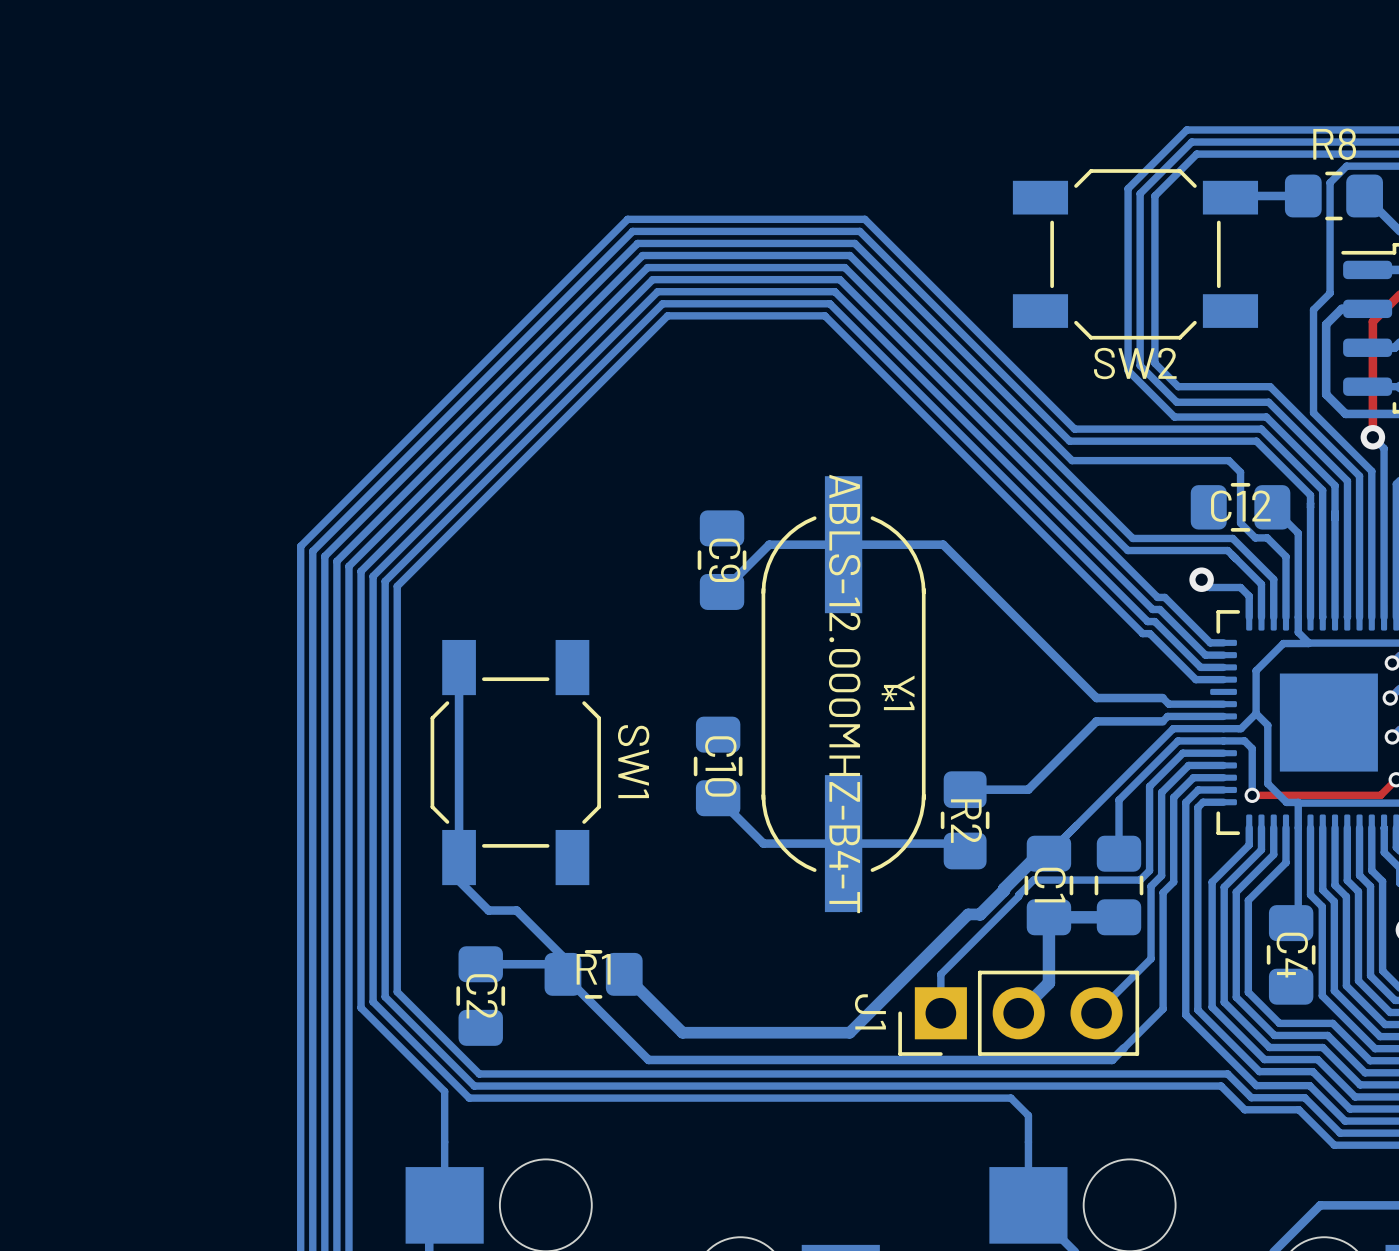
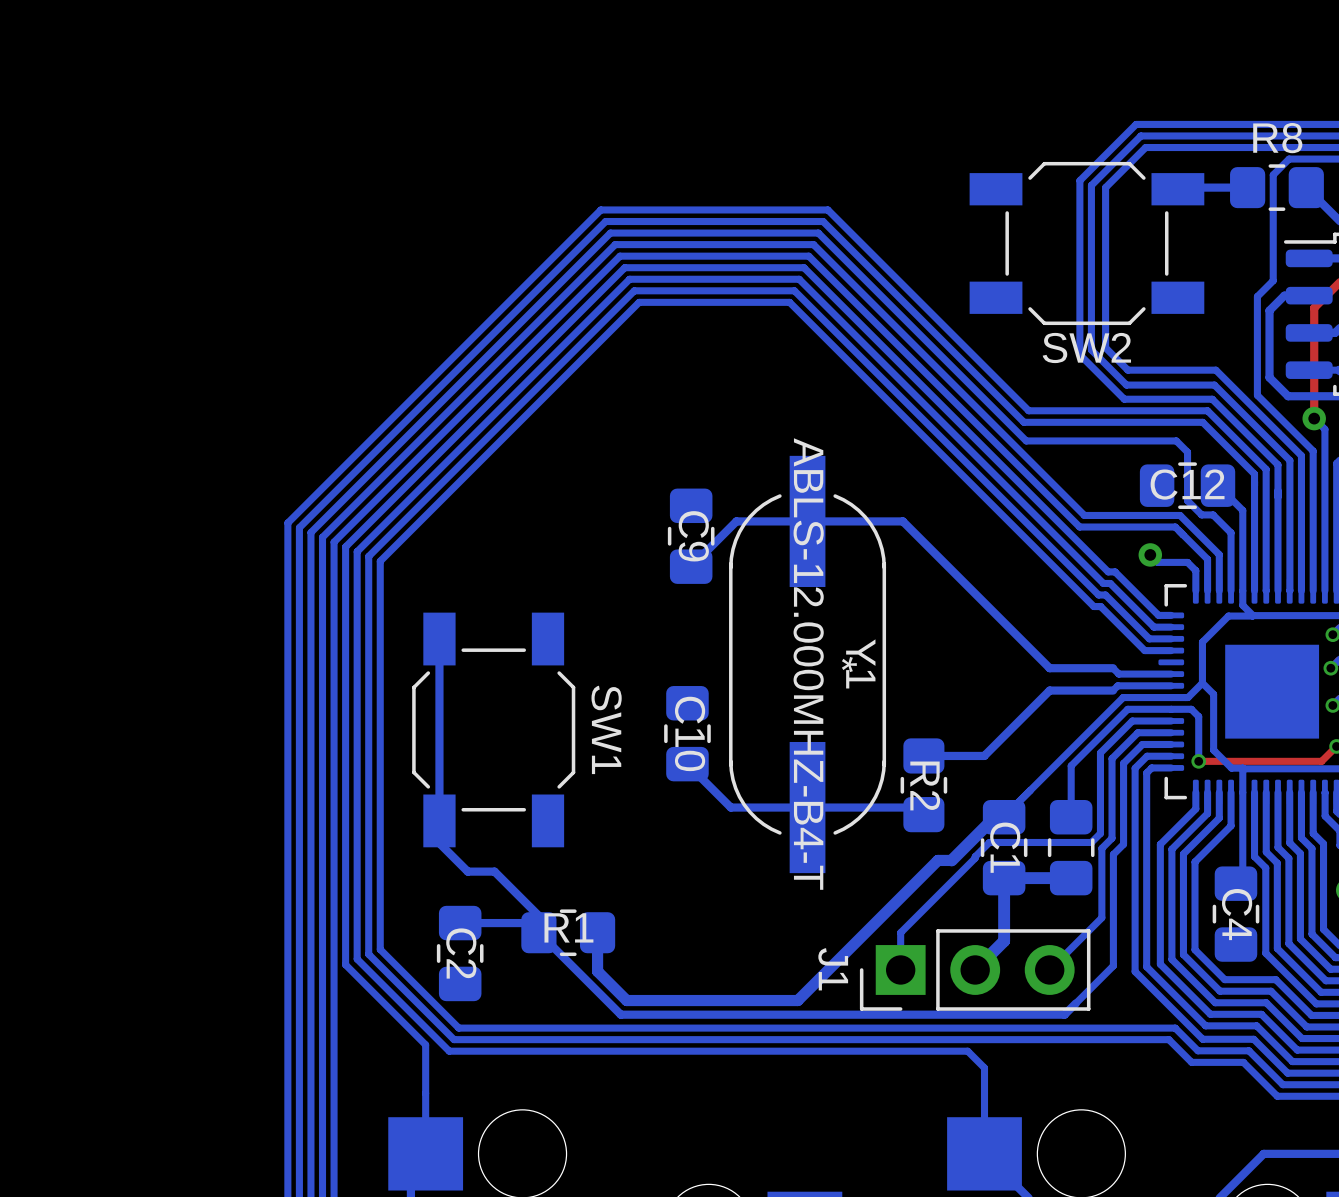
bottom track: (1004, 888) (980, 914) -> none
bottom track: (979, 914) (968, 914) (849, 1032) (682, 1032) (624, 974) -> (961, 850) (951, 860) (937, 860) (797, 1000) (626, 1000) (597, 971) (597, 932)

